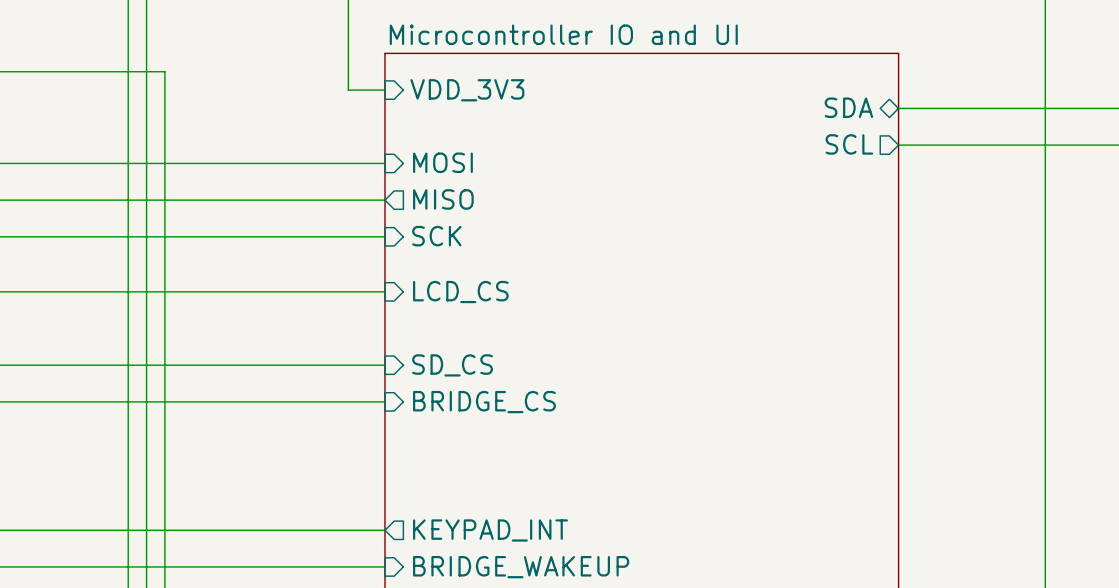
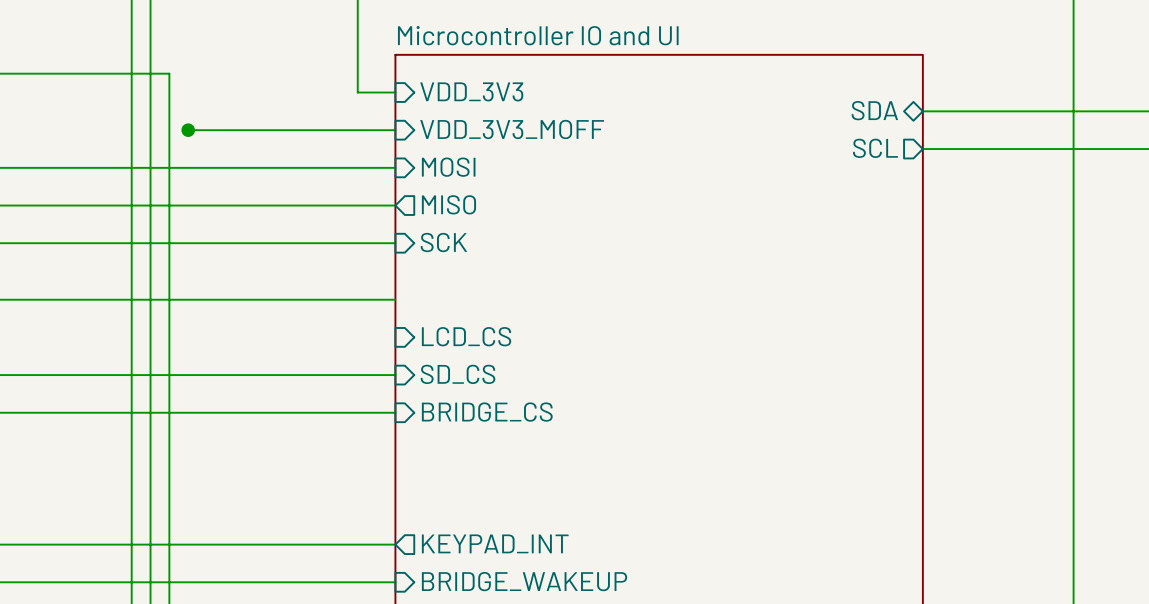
wire: none -> (188, 130) (395, 130)
junction: none -> (188, 130)
sheet pin: none -> VDD_3V3_MOFF (512, 129)
sheet pin position: LCD_CS (460, 292) -> LCD_CS (466, 336)

